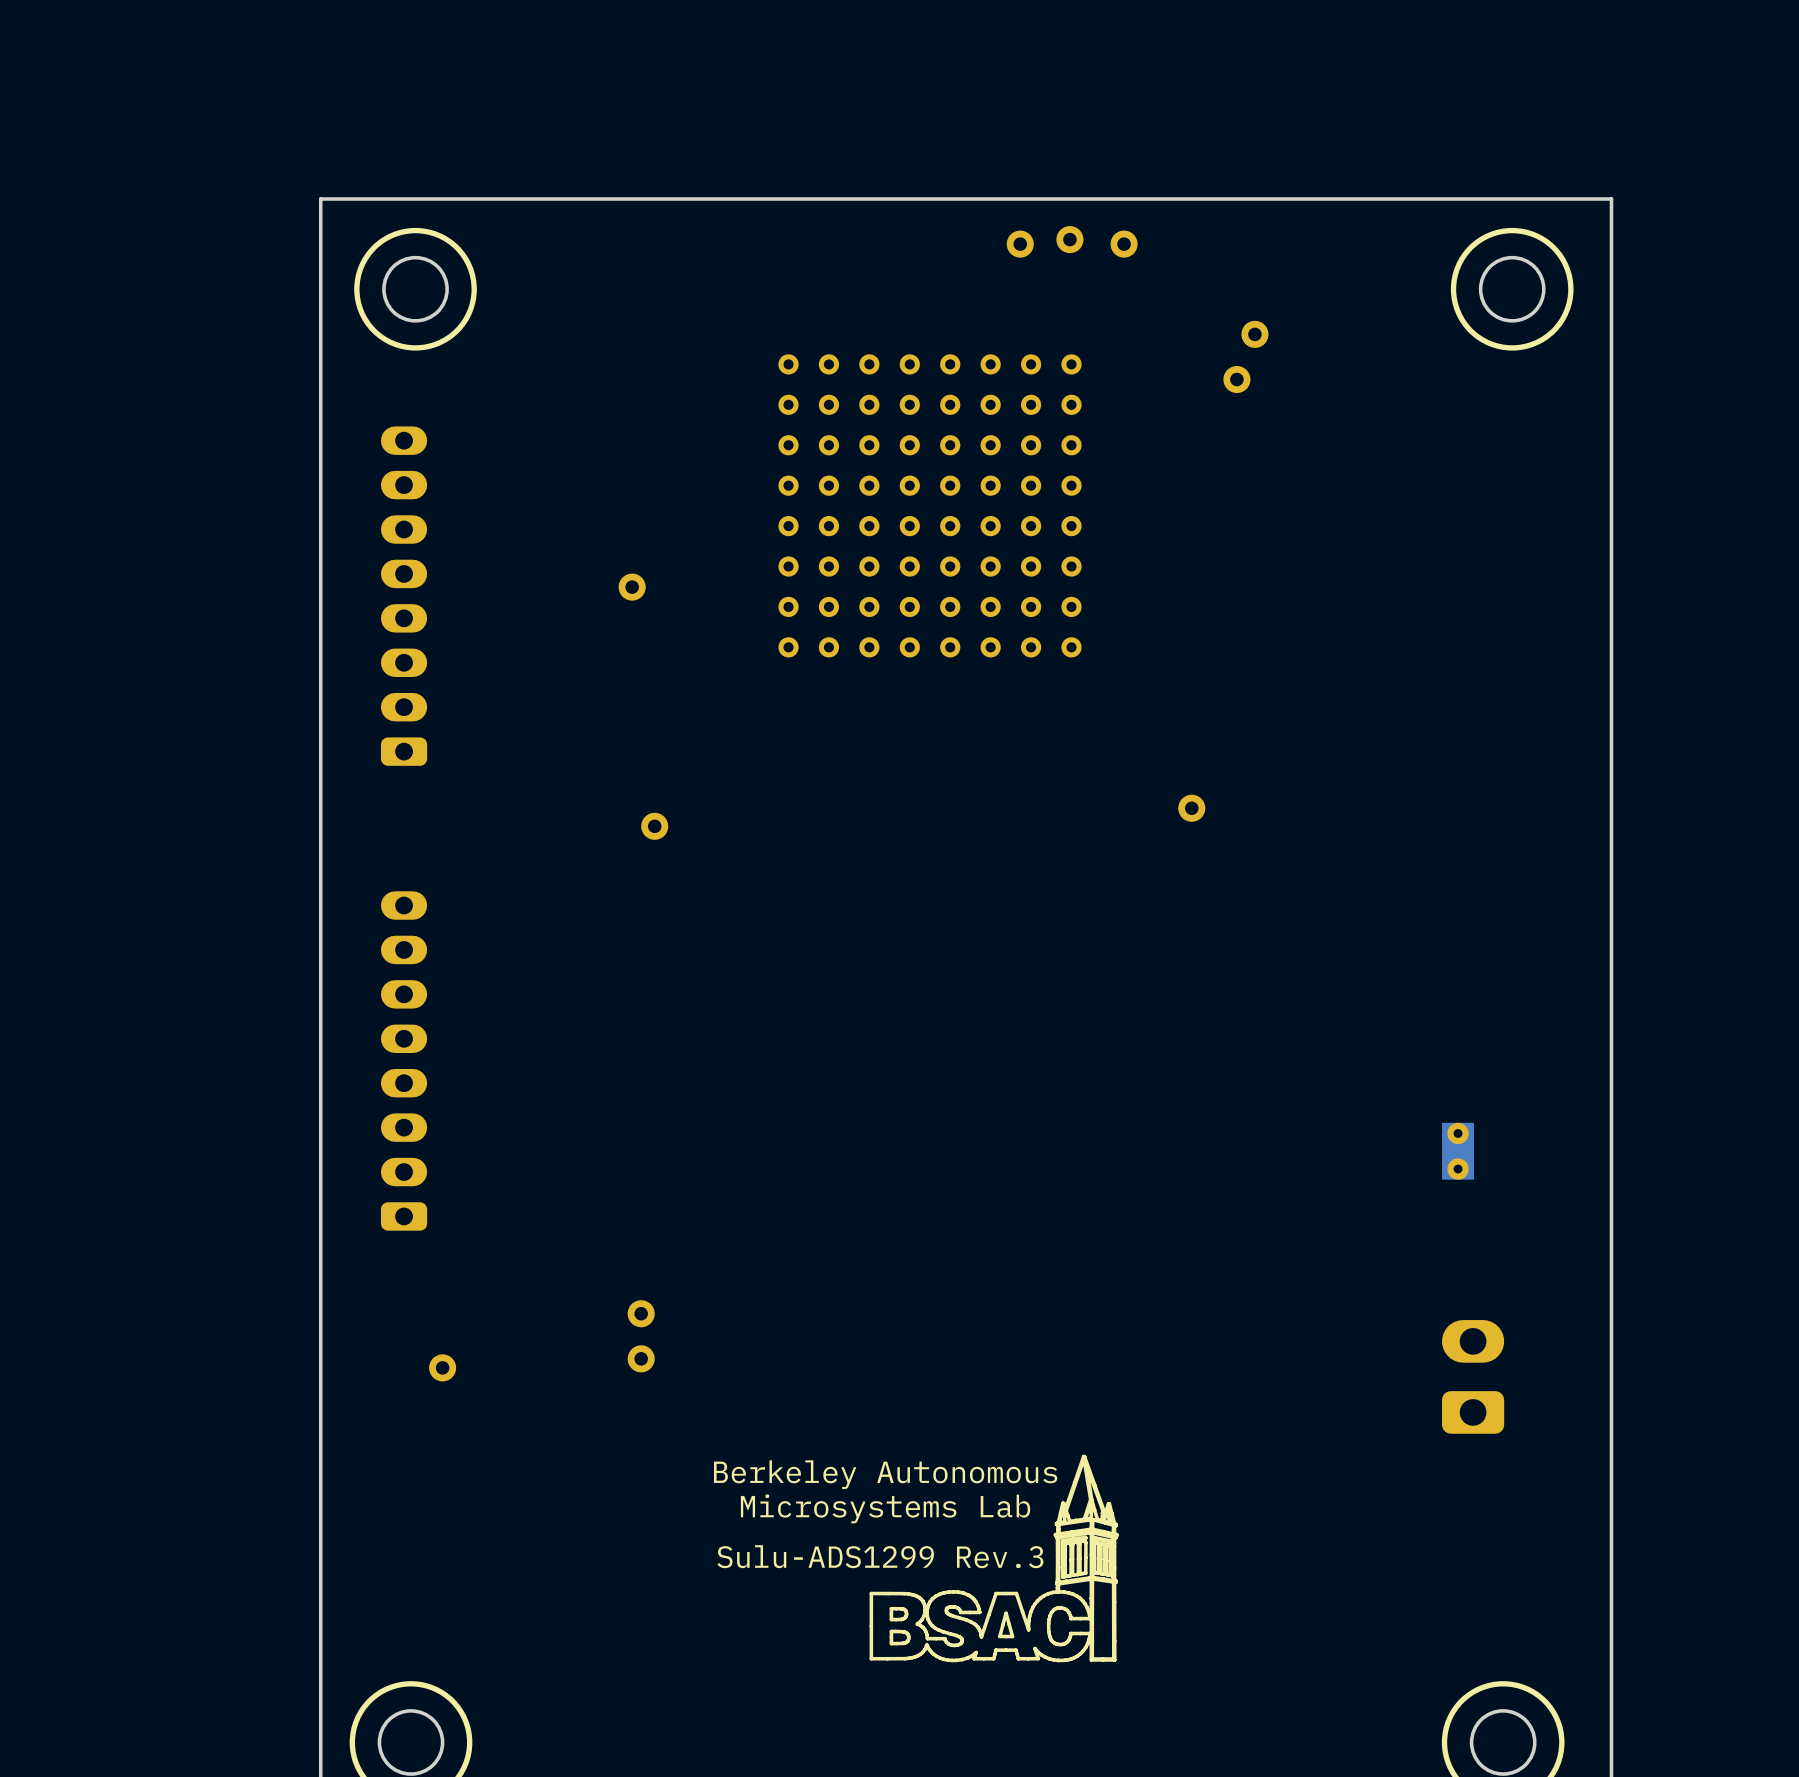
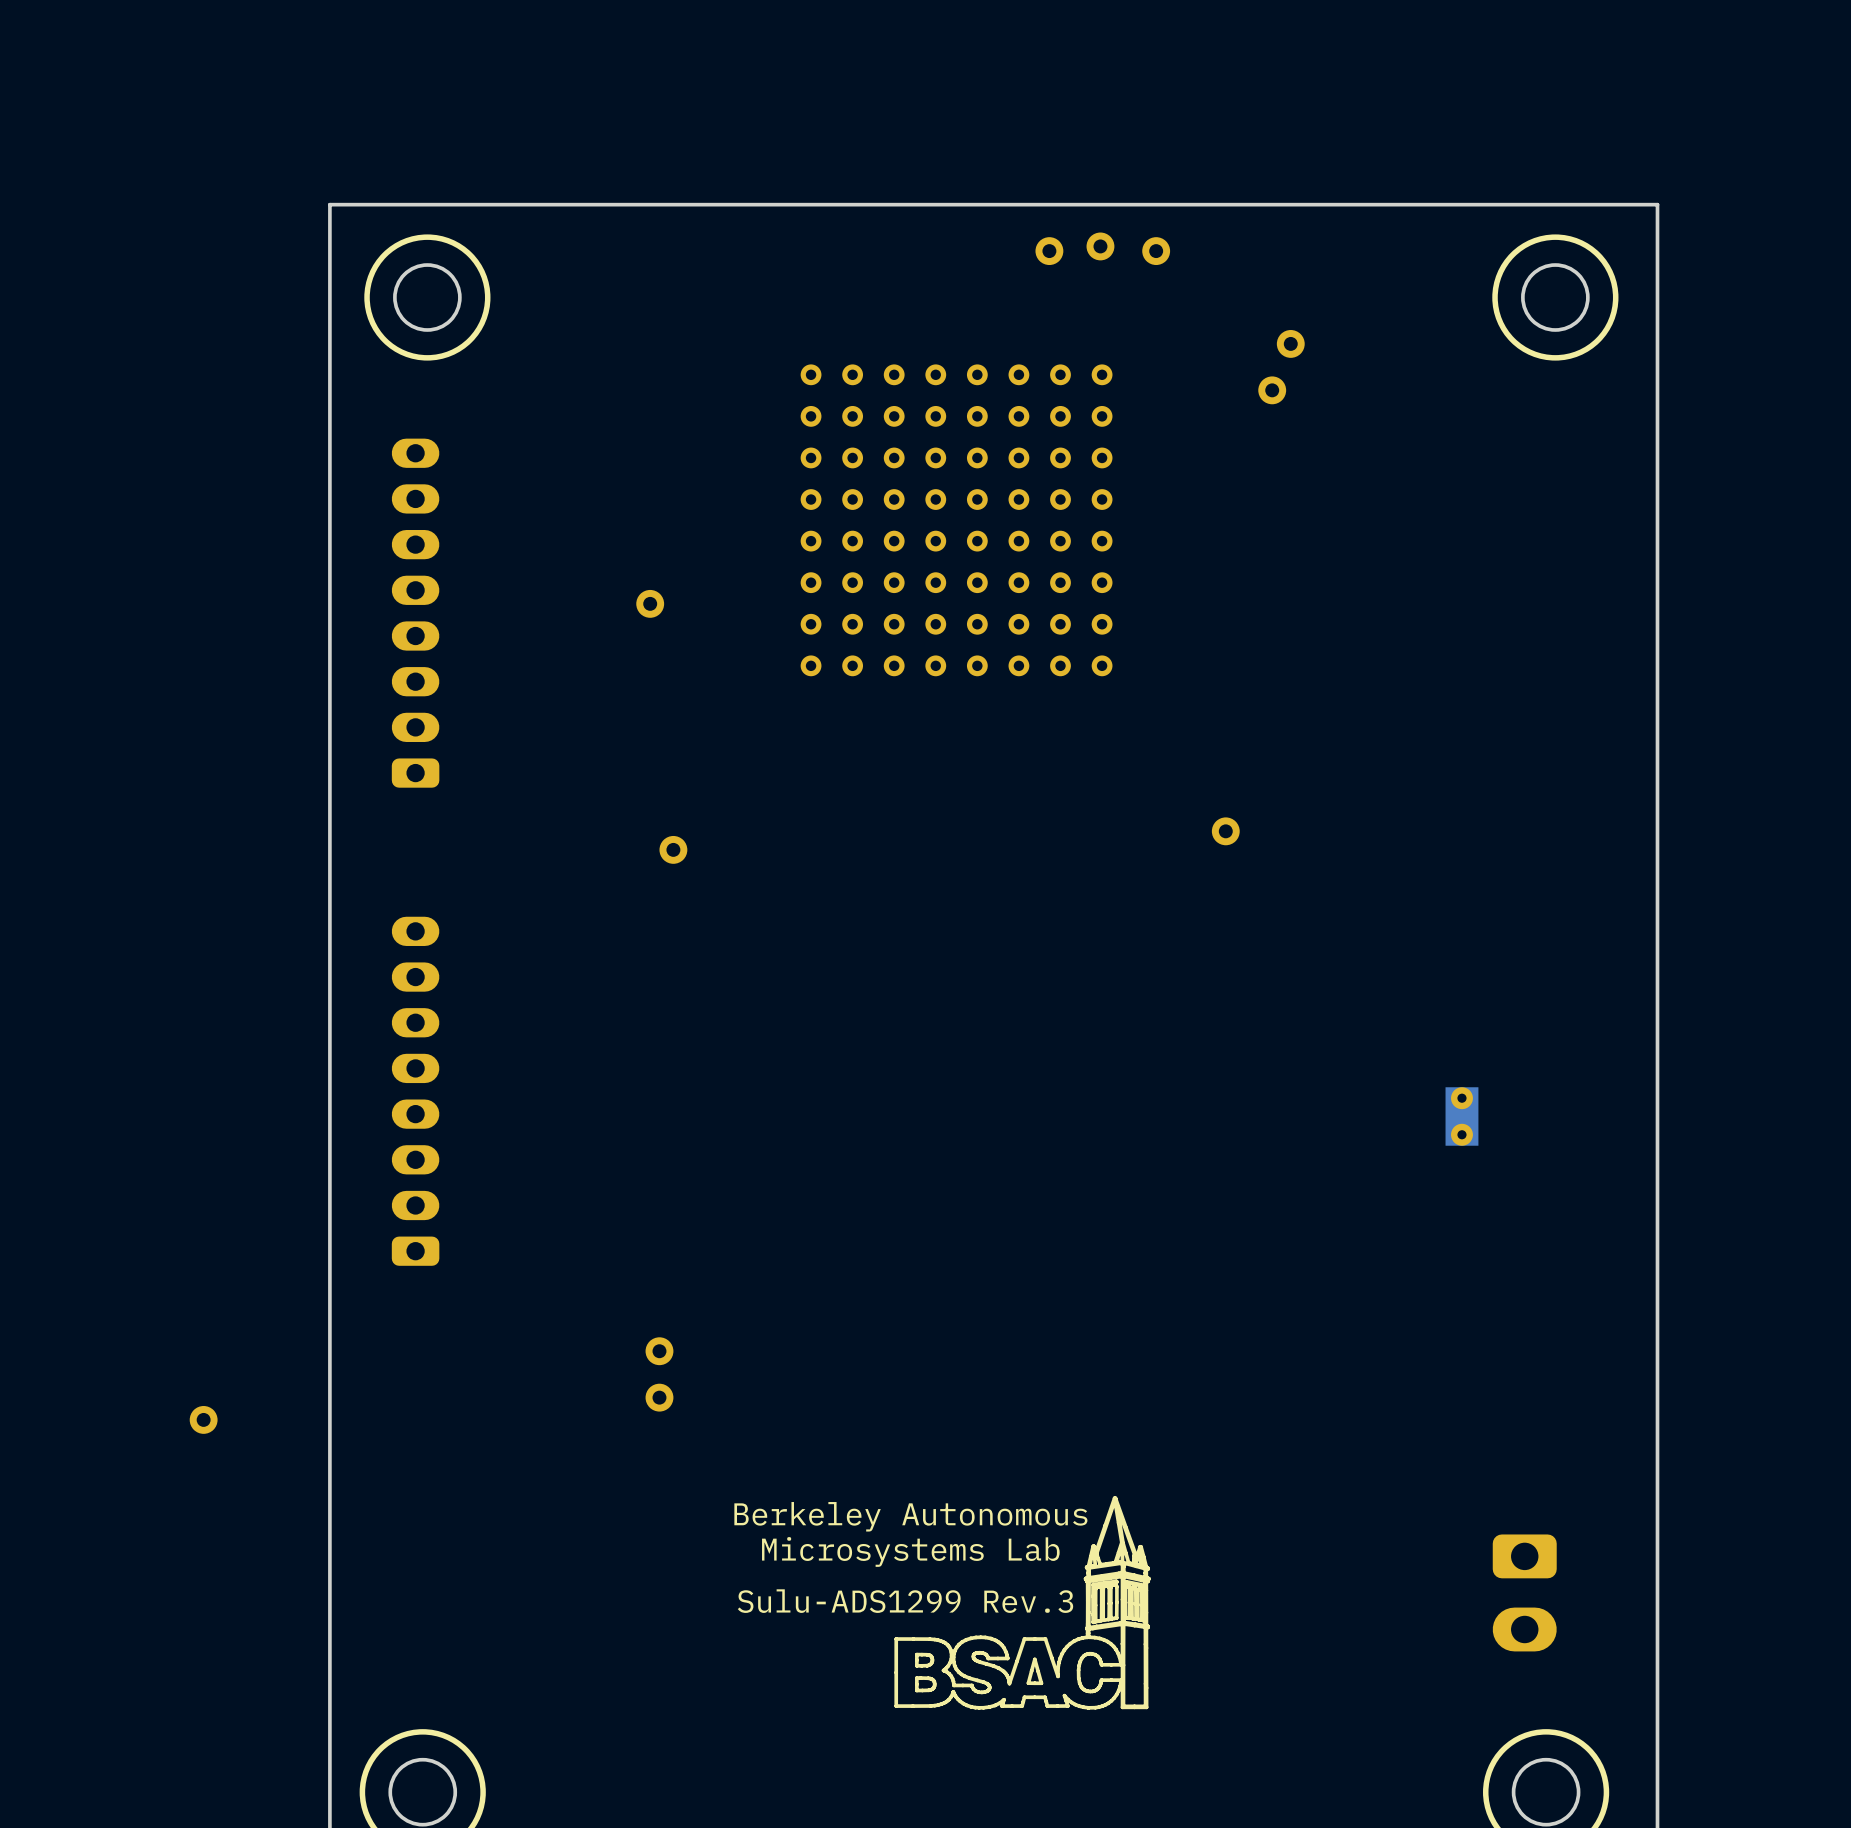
part position: (1458, 1151) -> (1461, 1116)
part position: (442, 1367) -> (203, 1419)
part rotation: 0° (1473, 1376) -> 180° (1524, 1592)
part position: (1473, 1376) -> (1524, 1592)

